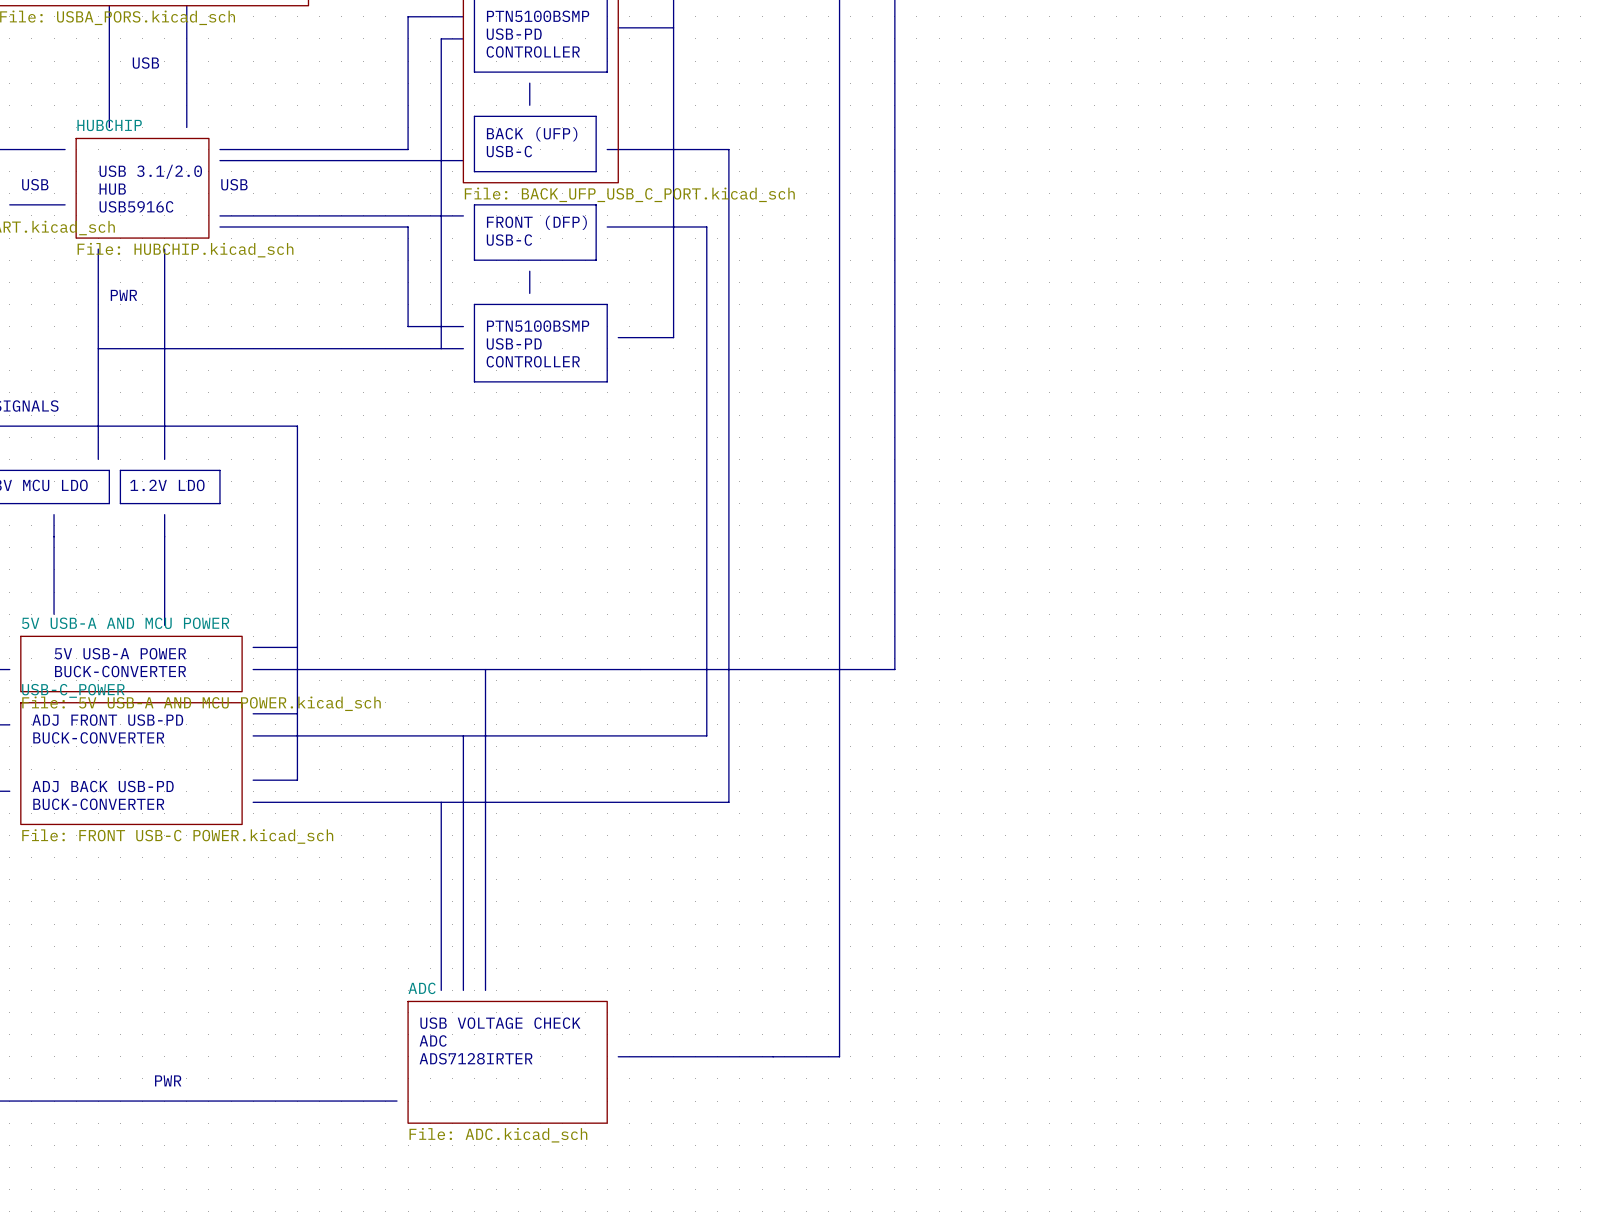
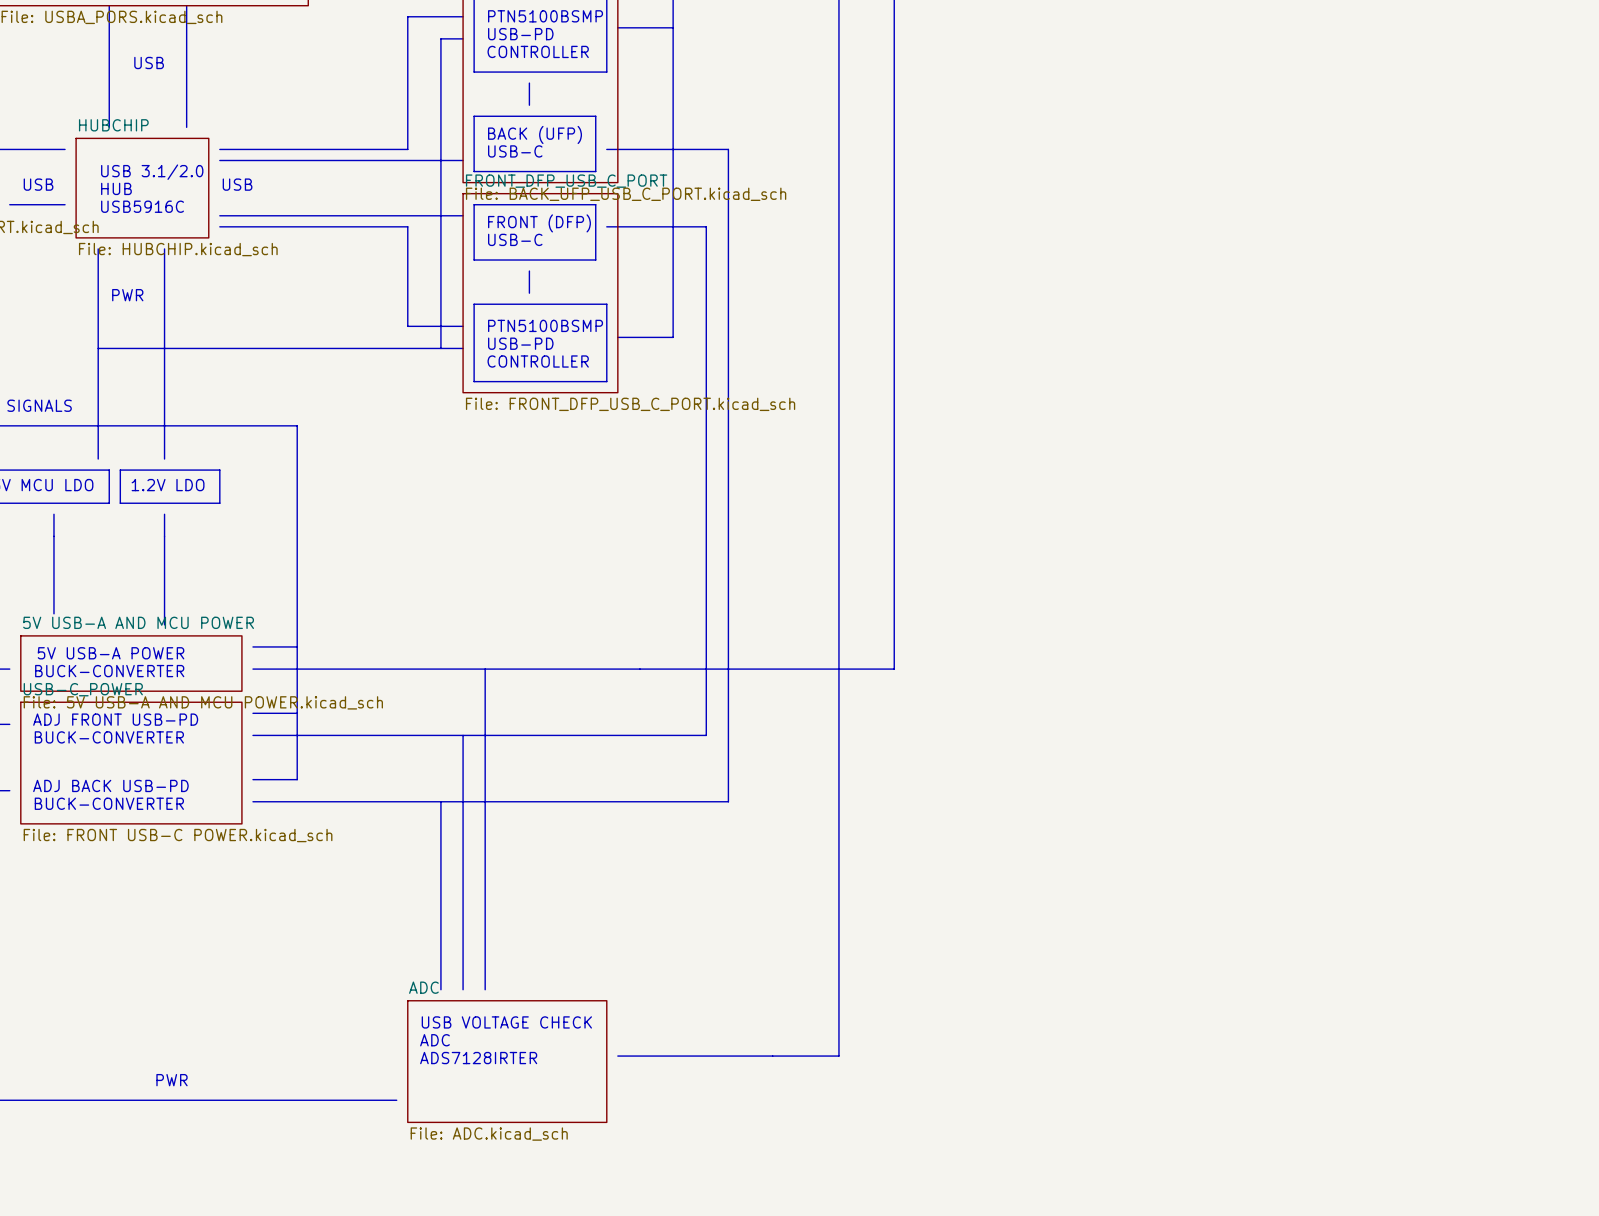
sheet FRONT_DFP_USB_C_PORT: none -> File: FRONT_DFP_USB_C_PORT.kicad_sch (540, 293)

